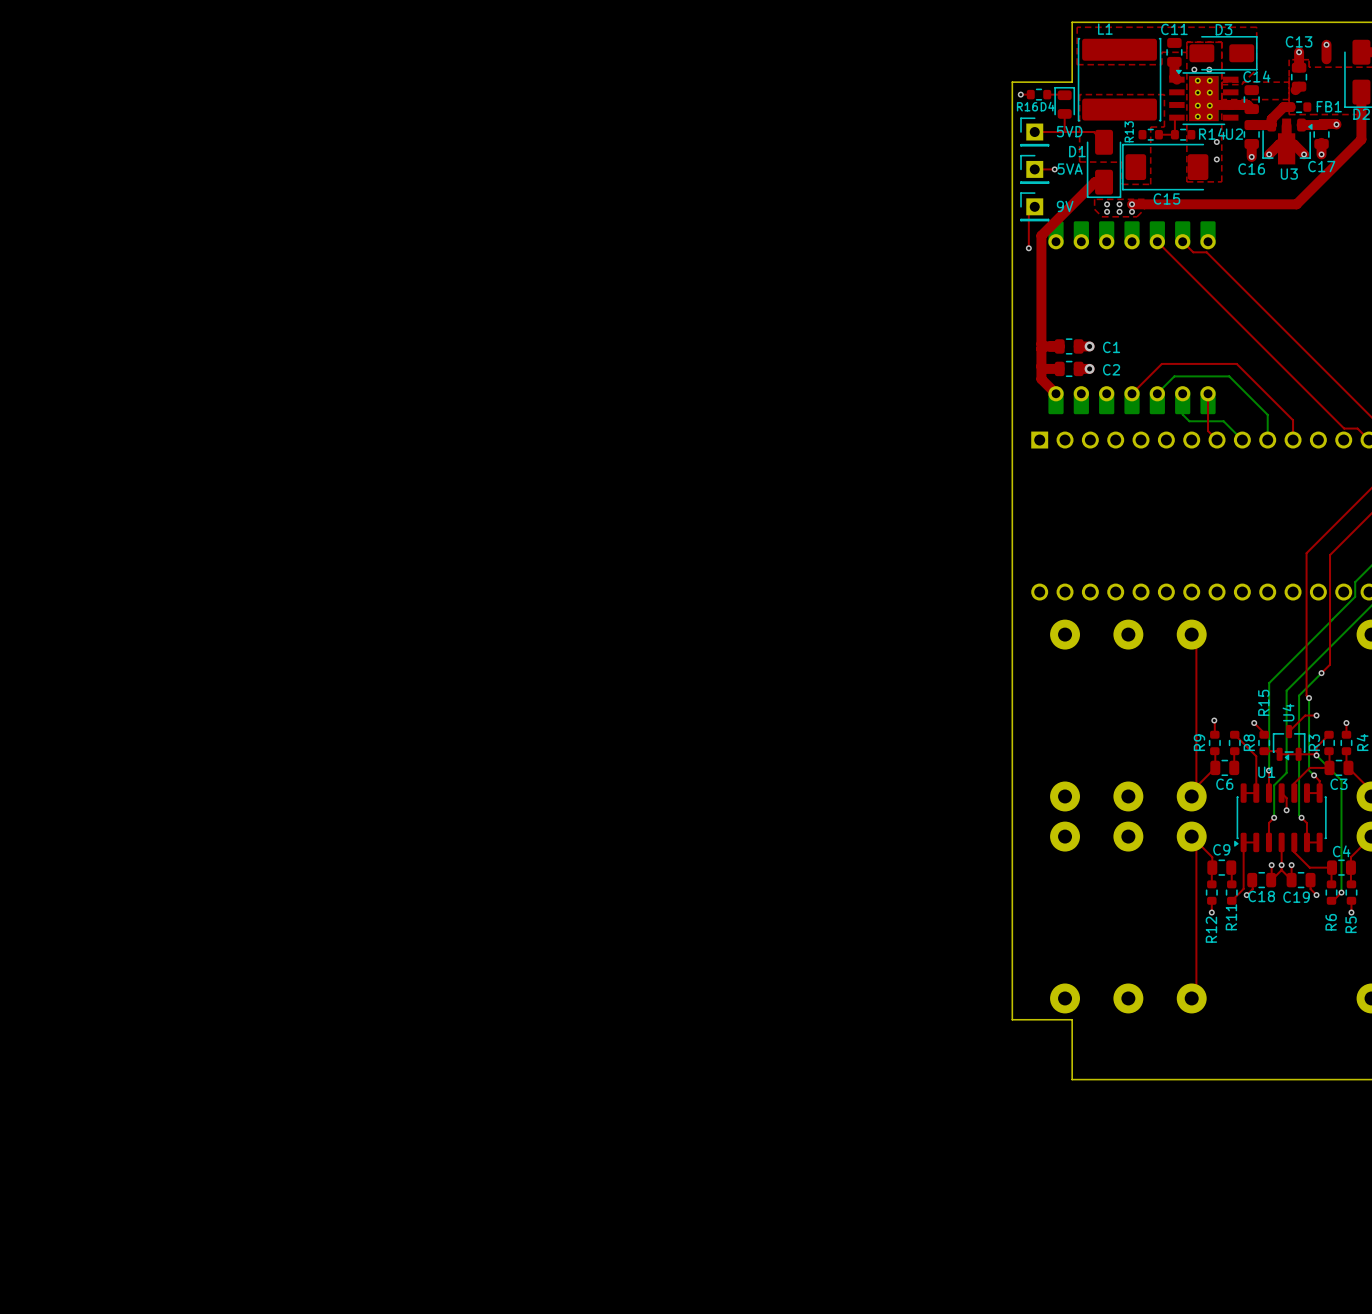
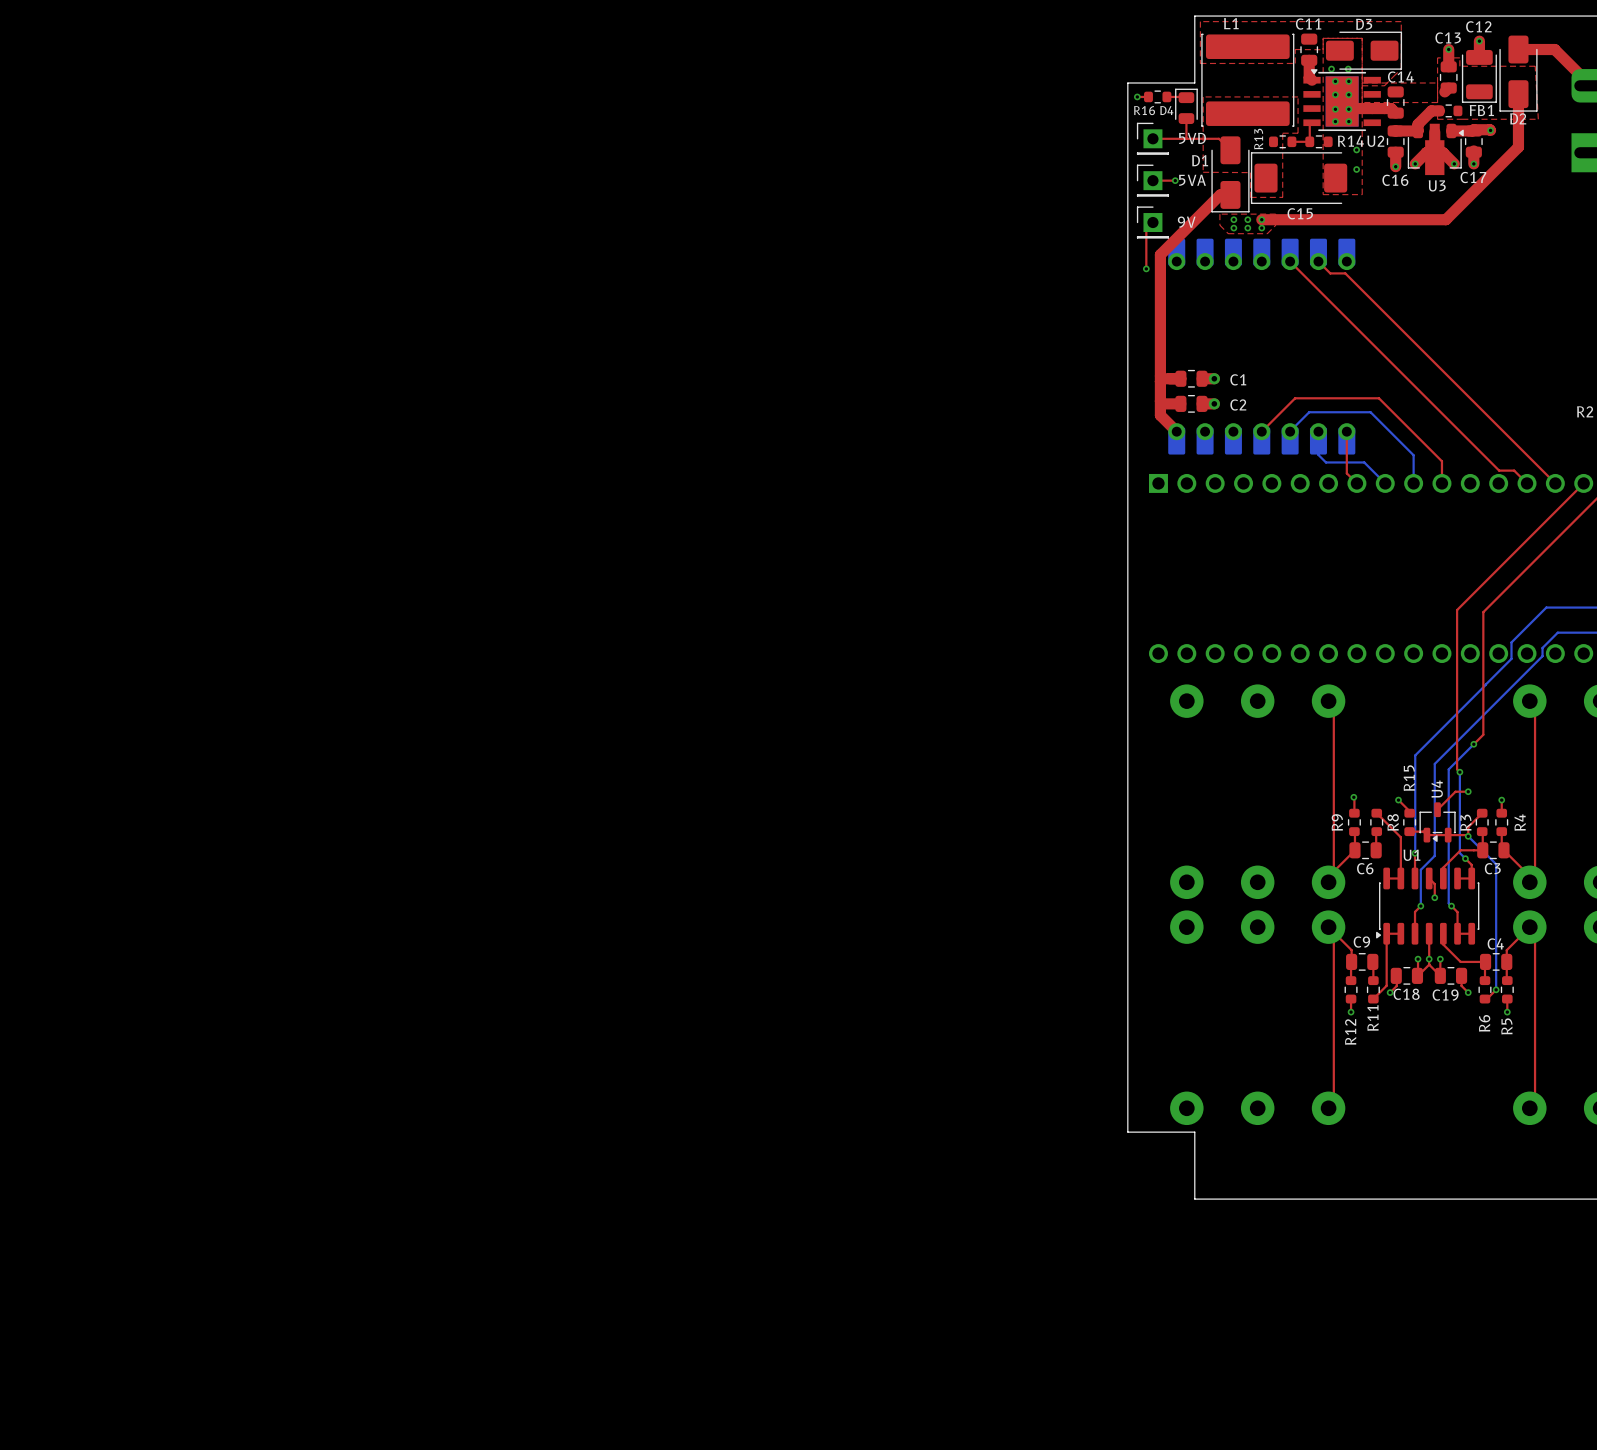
C12: none -> (1479, 76)

